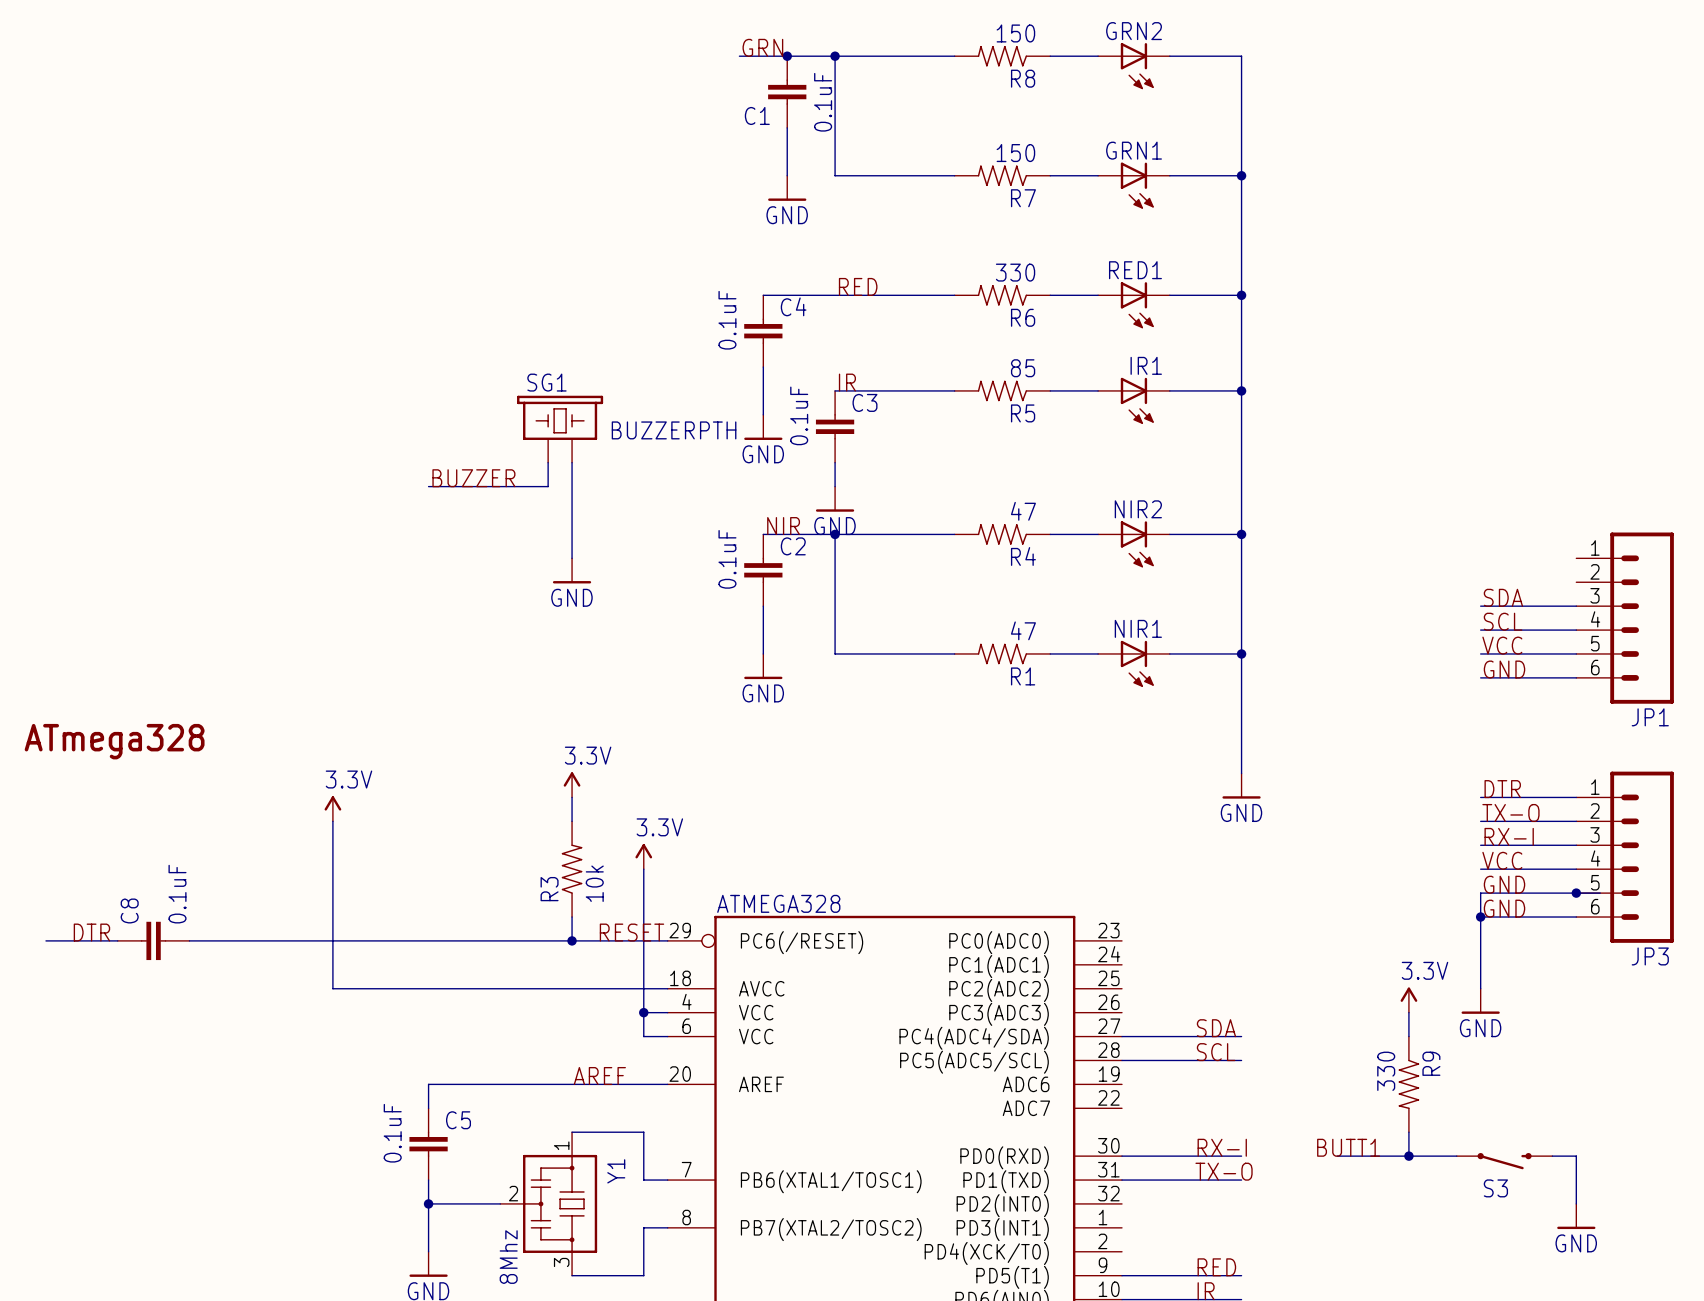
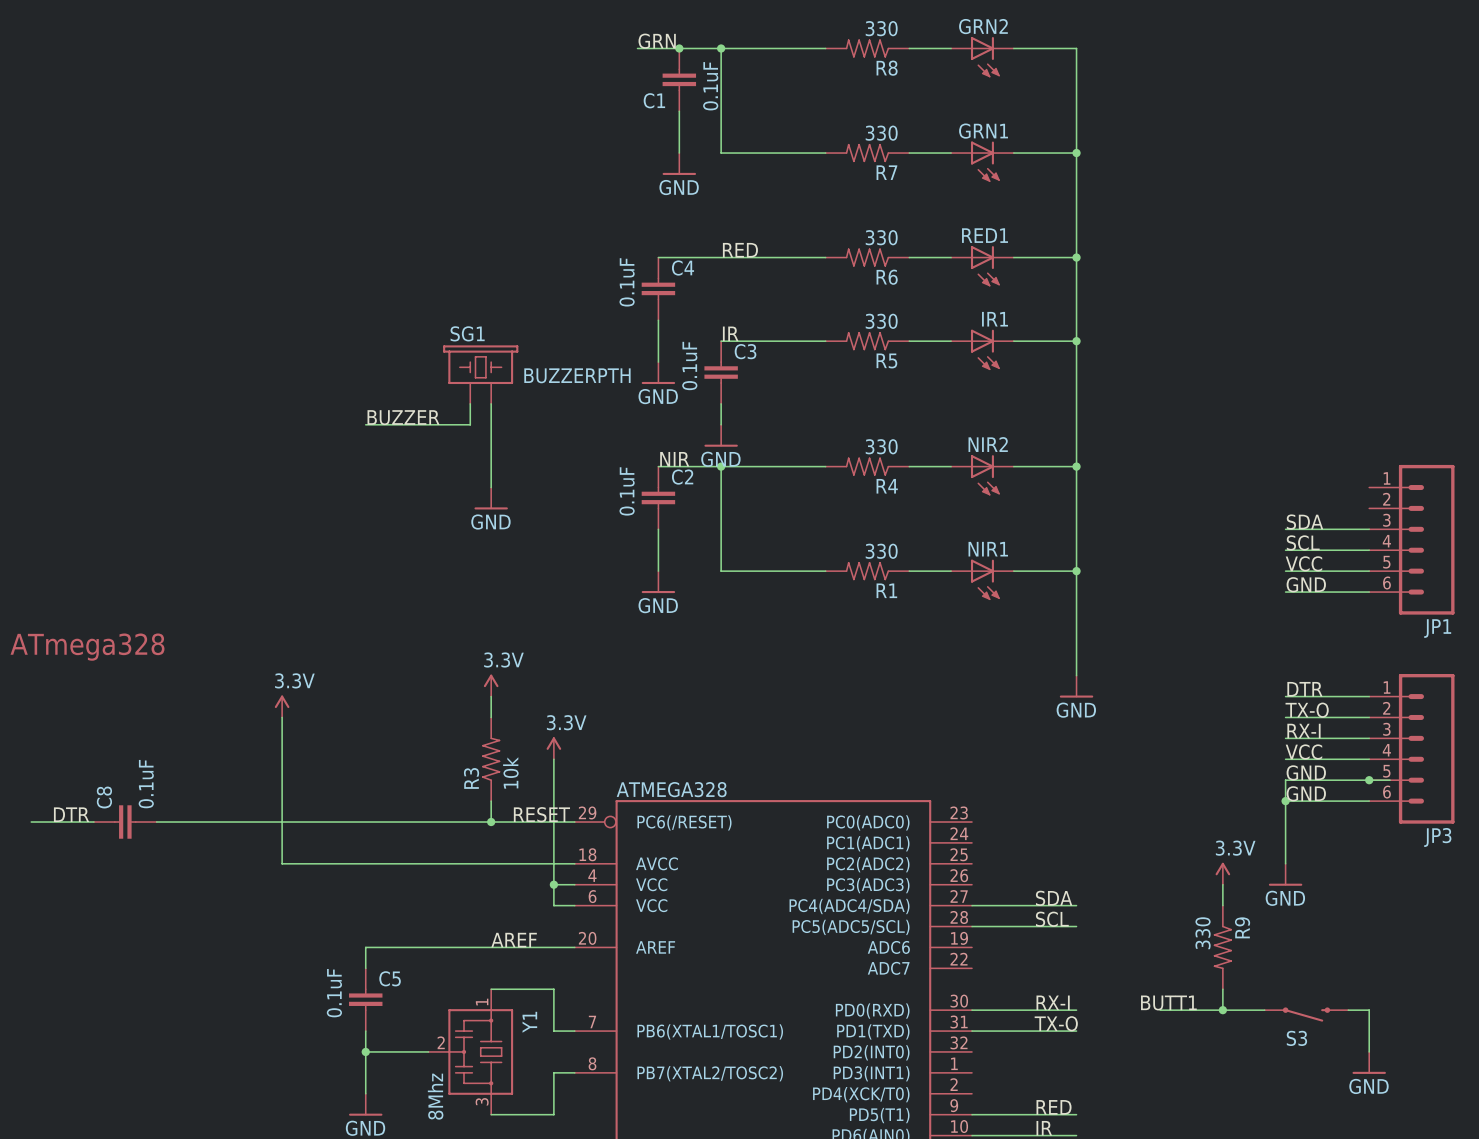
R8 value: 150 (1015, 33) -> 330 (881, 28)
R7 value: 150 (1015, 153) -> 330 (881, 133)
R5 value: 85 (1023, 368) -> 330 (881, 321)
R4 value: 47 (1023, 511) -> 330 (881, 446)
R1 value: 47 (1023, 630) -> 330 (881, 551)

